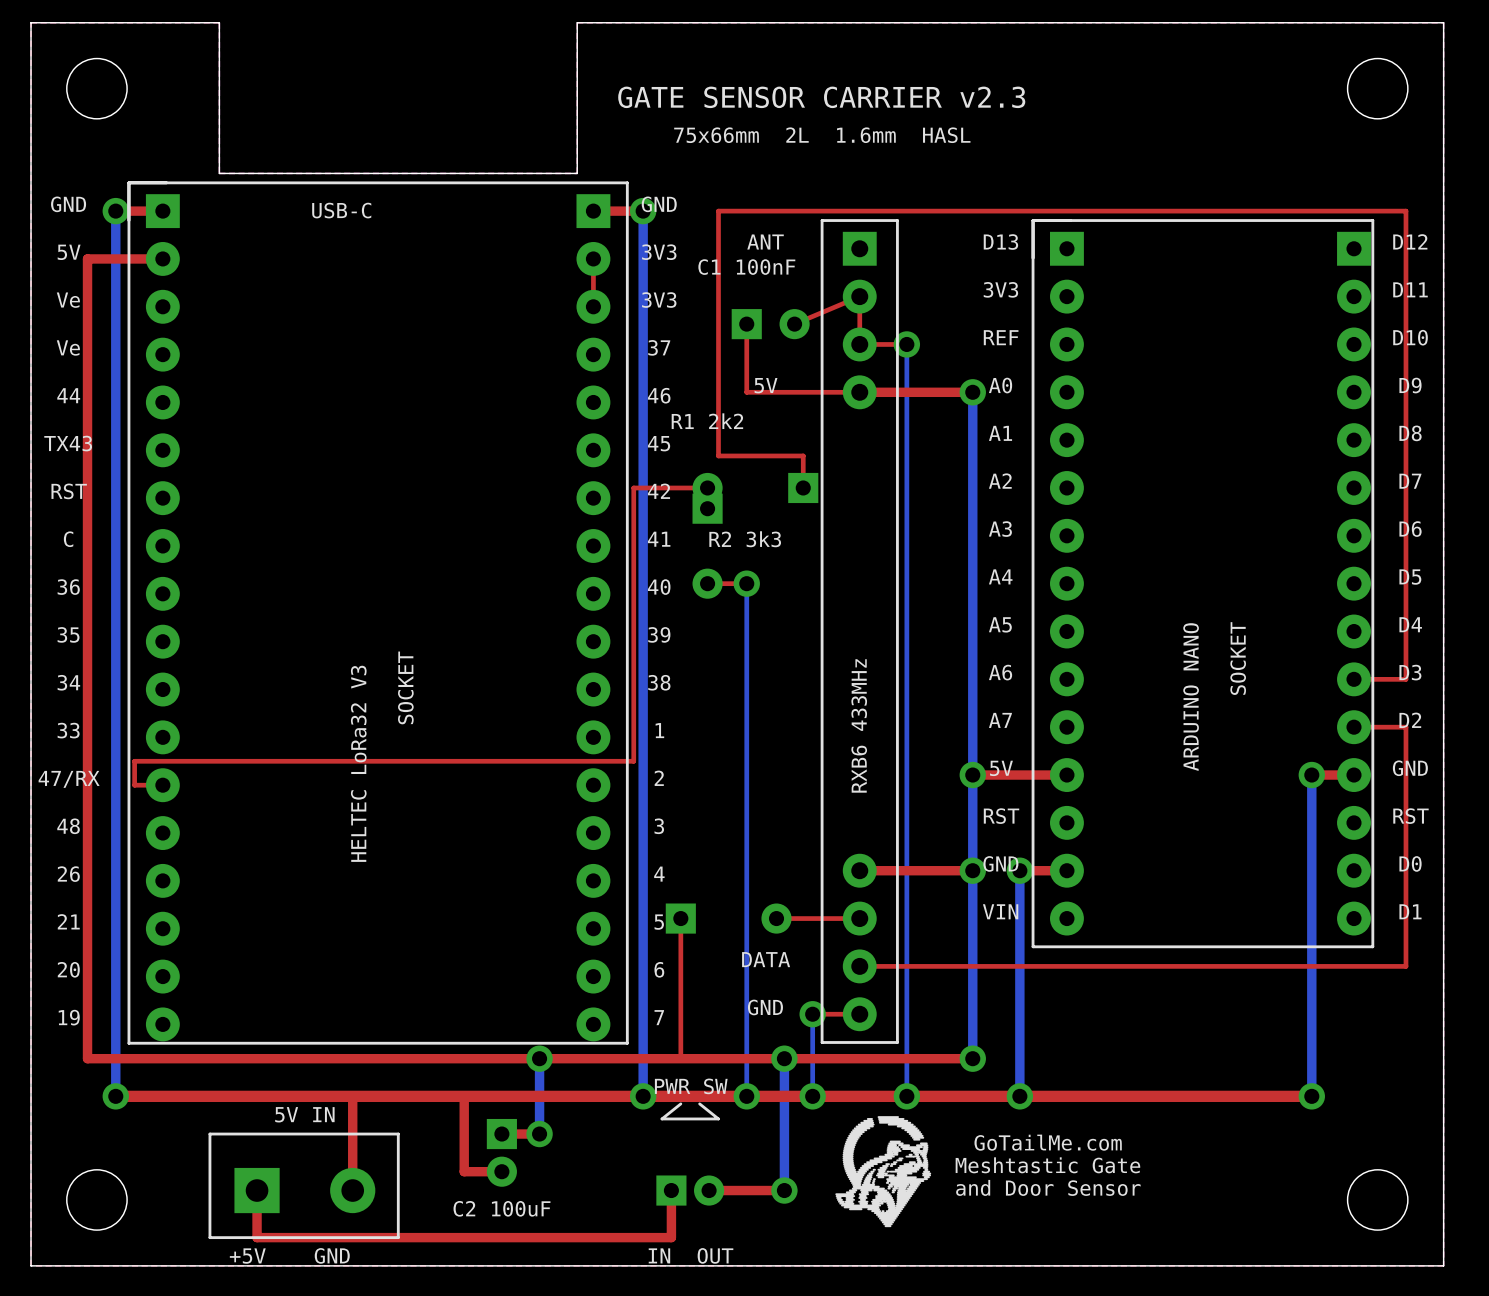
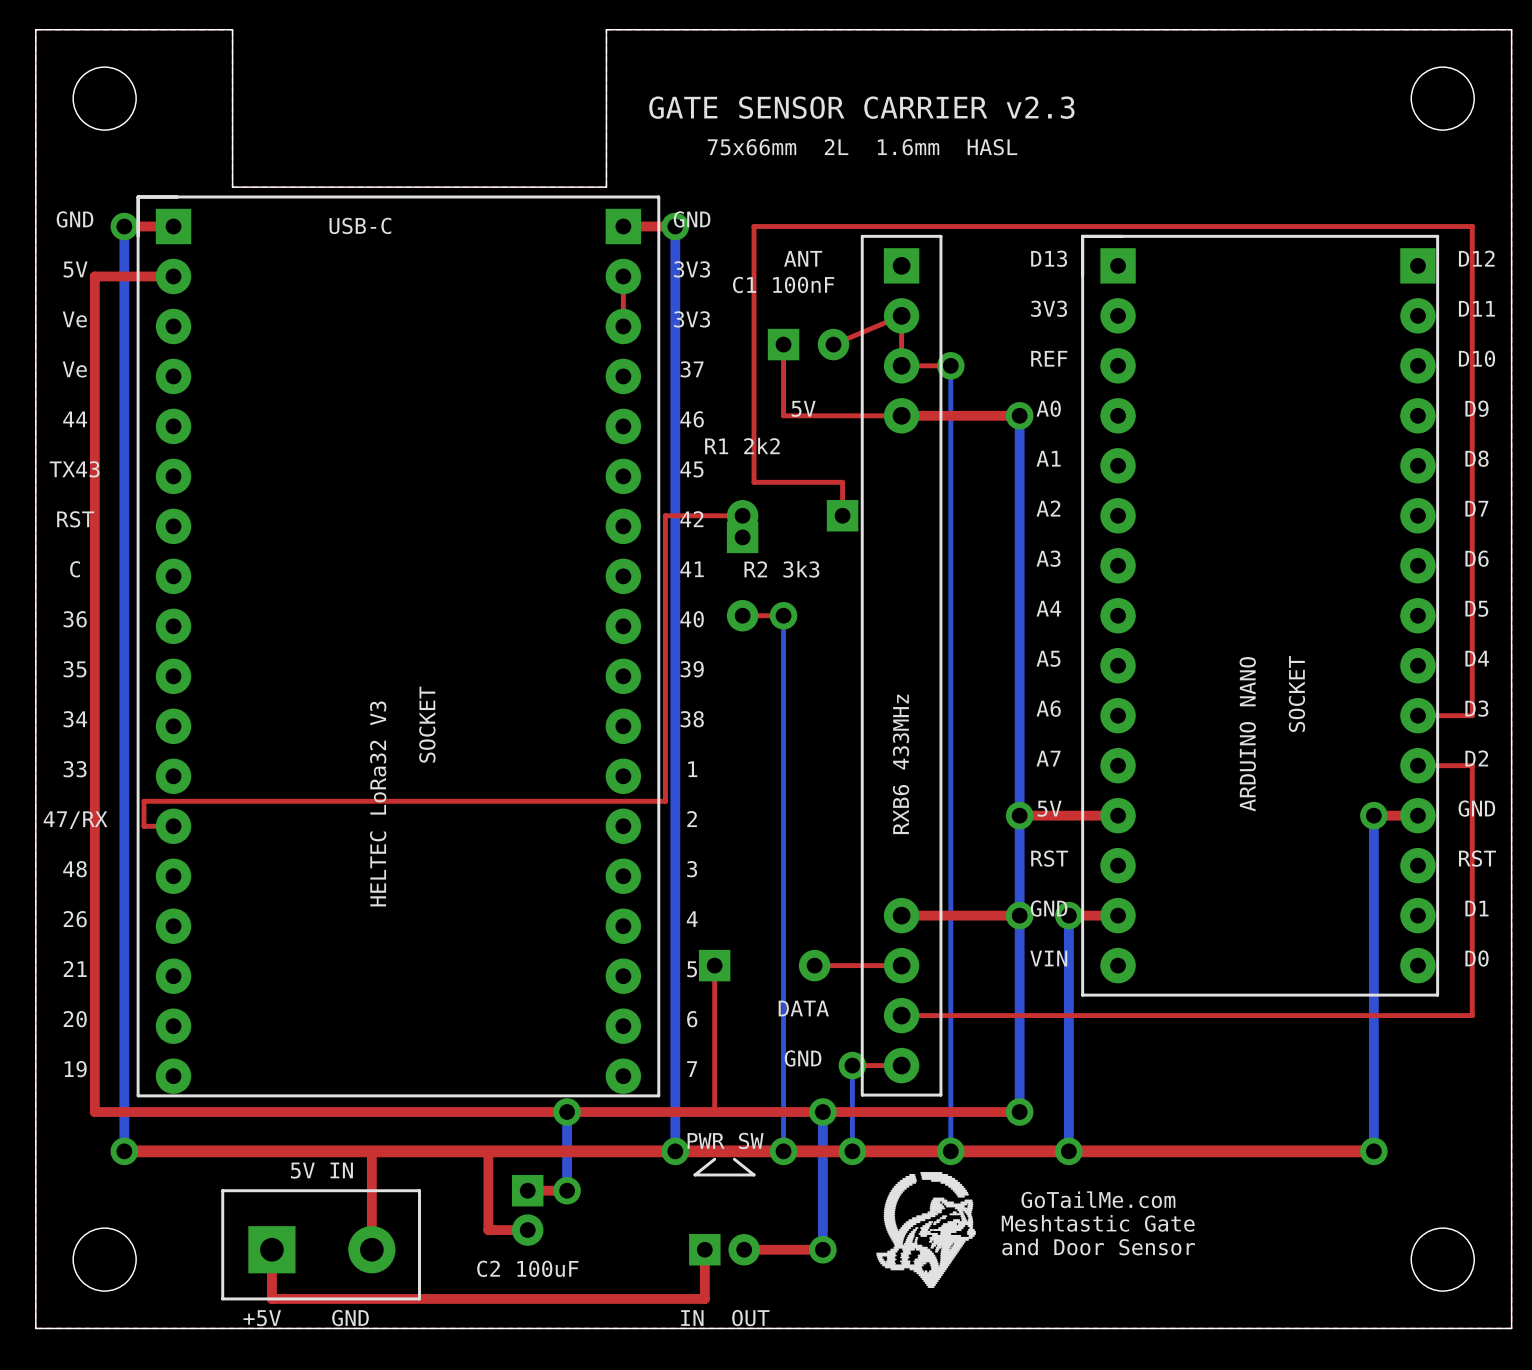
text: D0 (1410, 863) -> D1 (1476, 908)
text: D1 (1410, 911) -> D0 (1477, 958)

